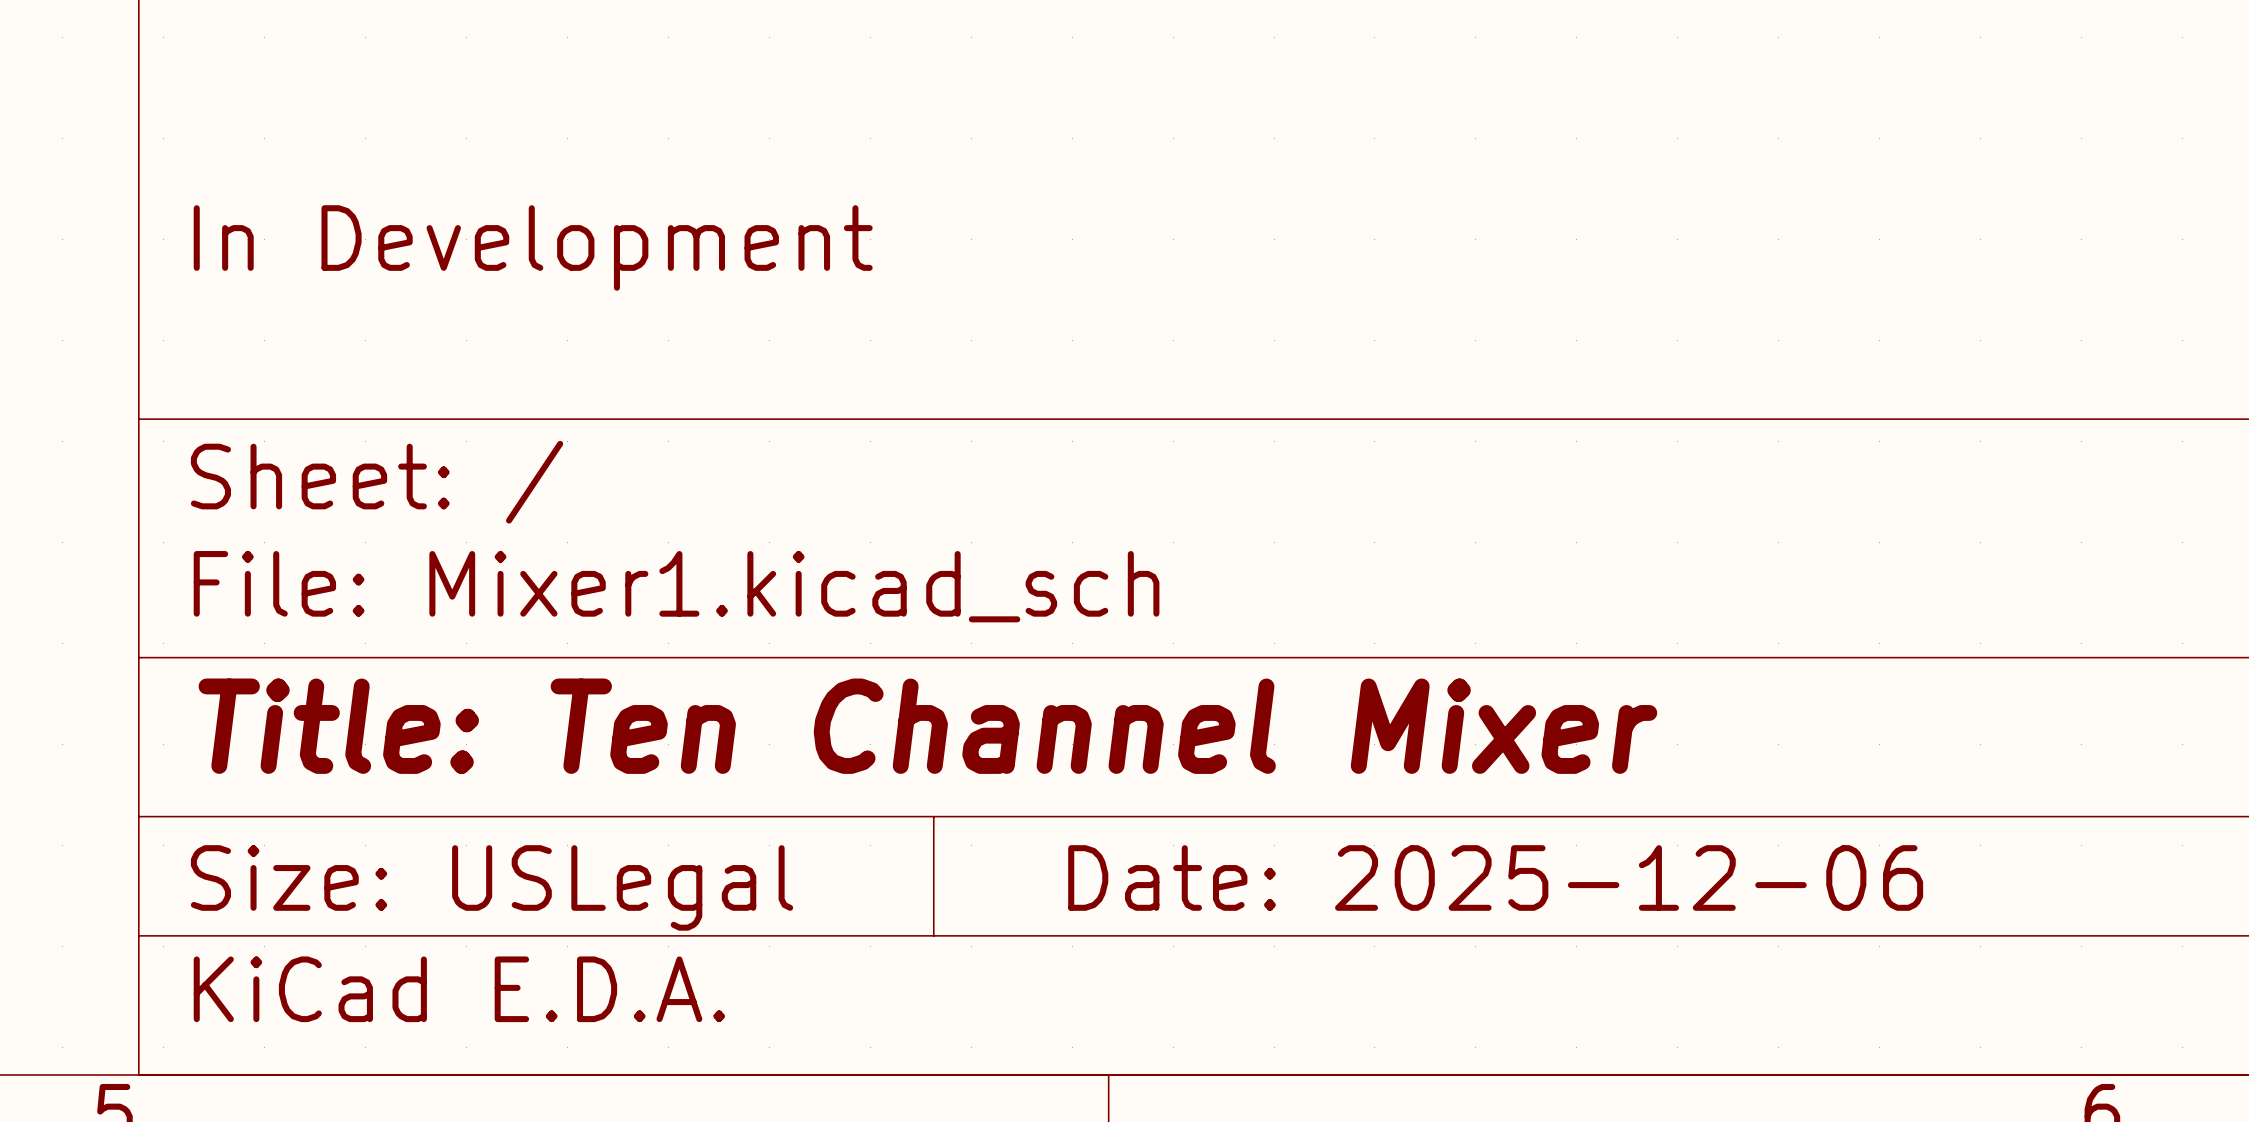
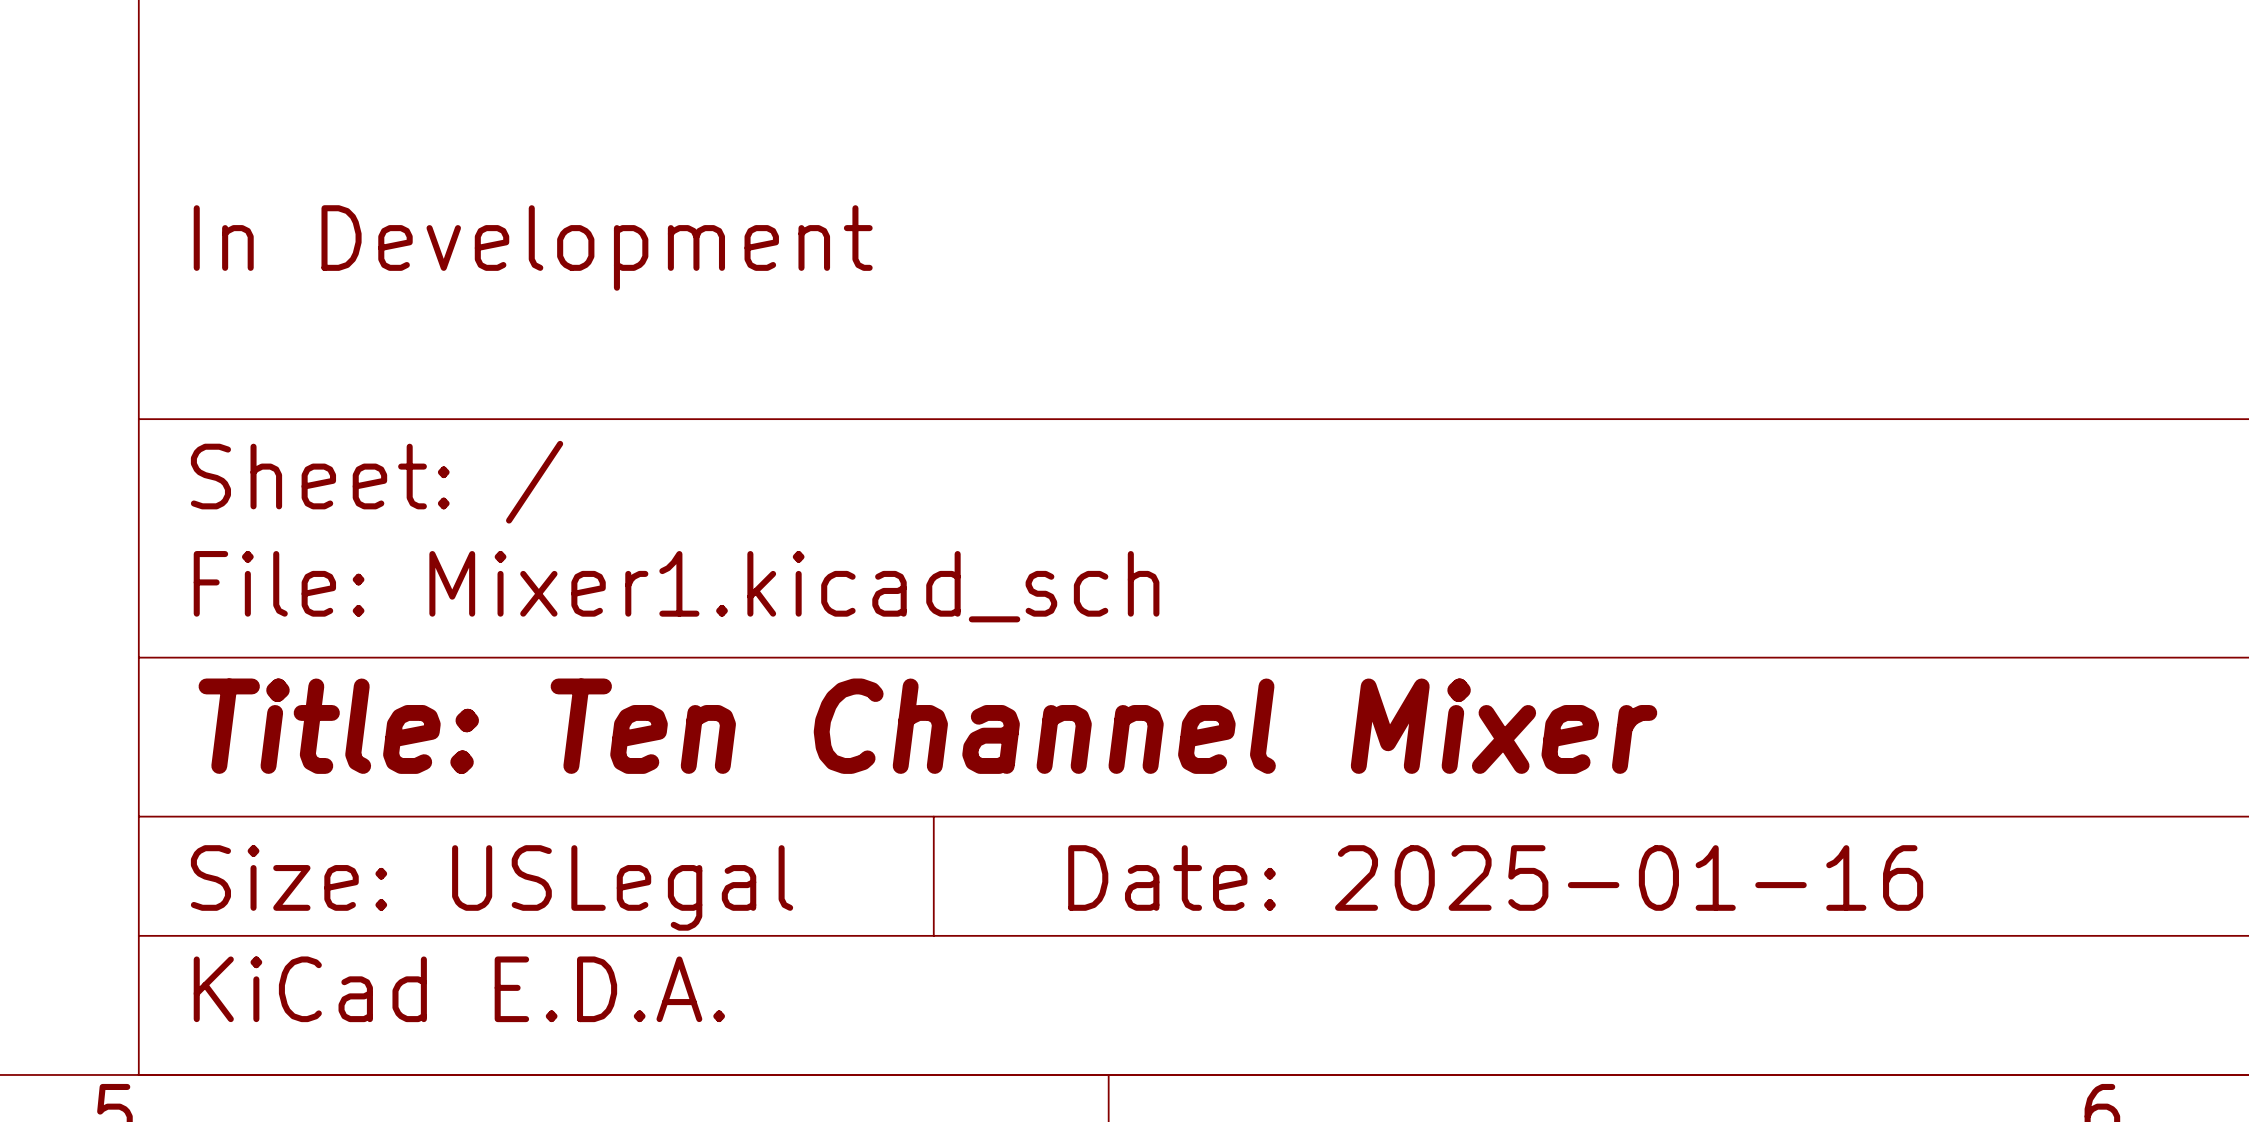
title block: Date: 2025-12-06 (1495, 877) -> Date: 2025-01-16 (1495, 877)

